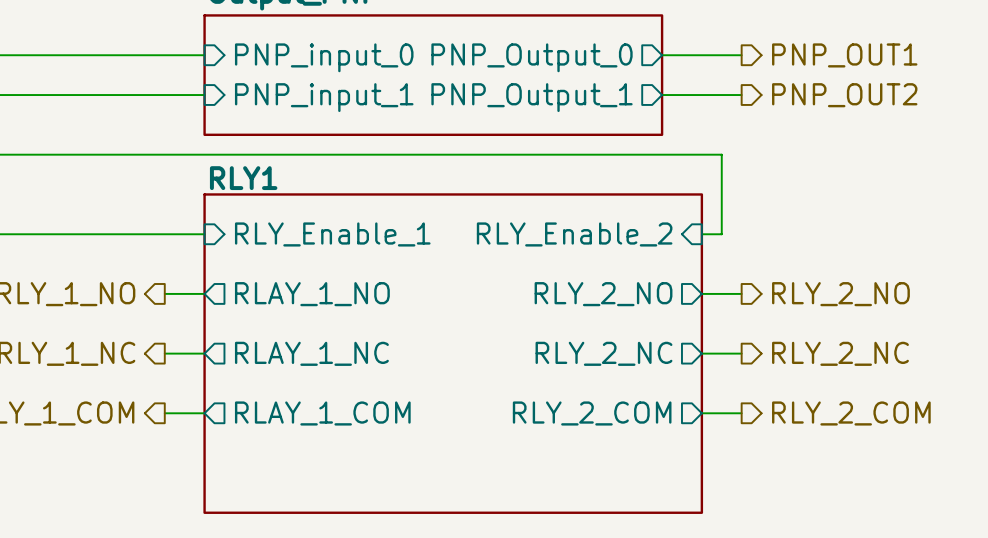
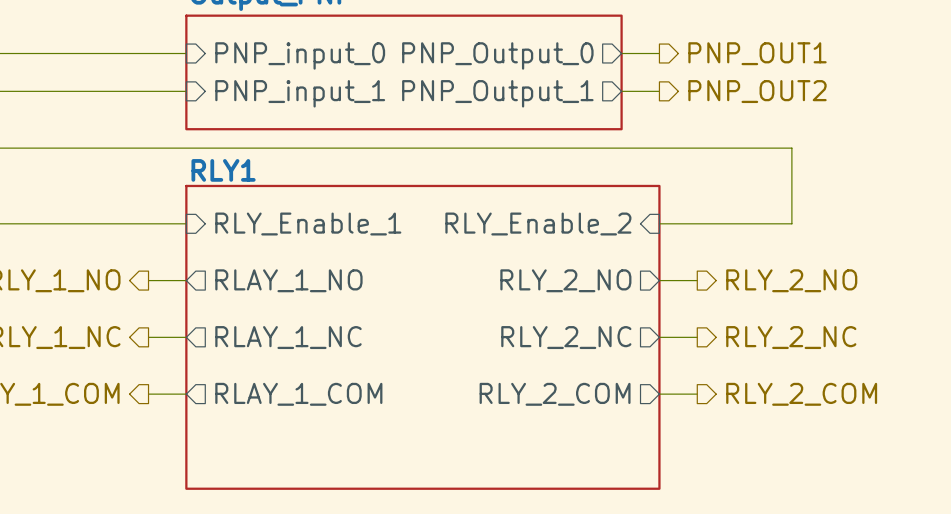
wire: (701, 55) (741, 55) -> none
hierarchical label position: PNP_OUT1 (844, 55) -> PNP_OUT1 (757, 53)
wire: (701, 95) (741, 95) -> none
hierarchical label position: PNP_OUT2 (844, 95) -> PNP_OUT2 (757, 91)
wire: (721, 154) (721, 234) -> (678, 148) (791, 148) (791, 223) (678, 223)

